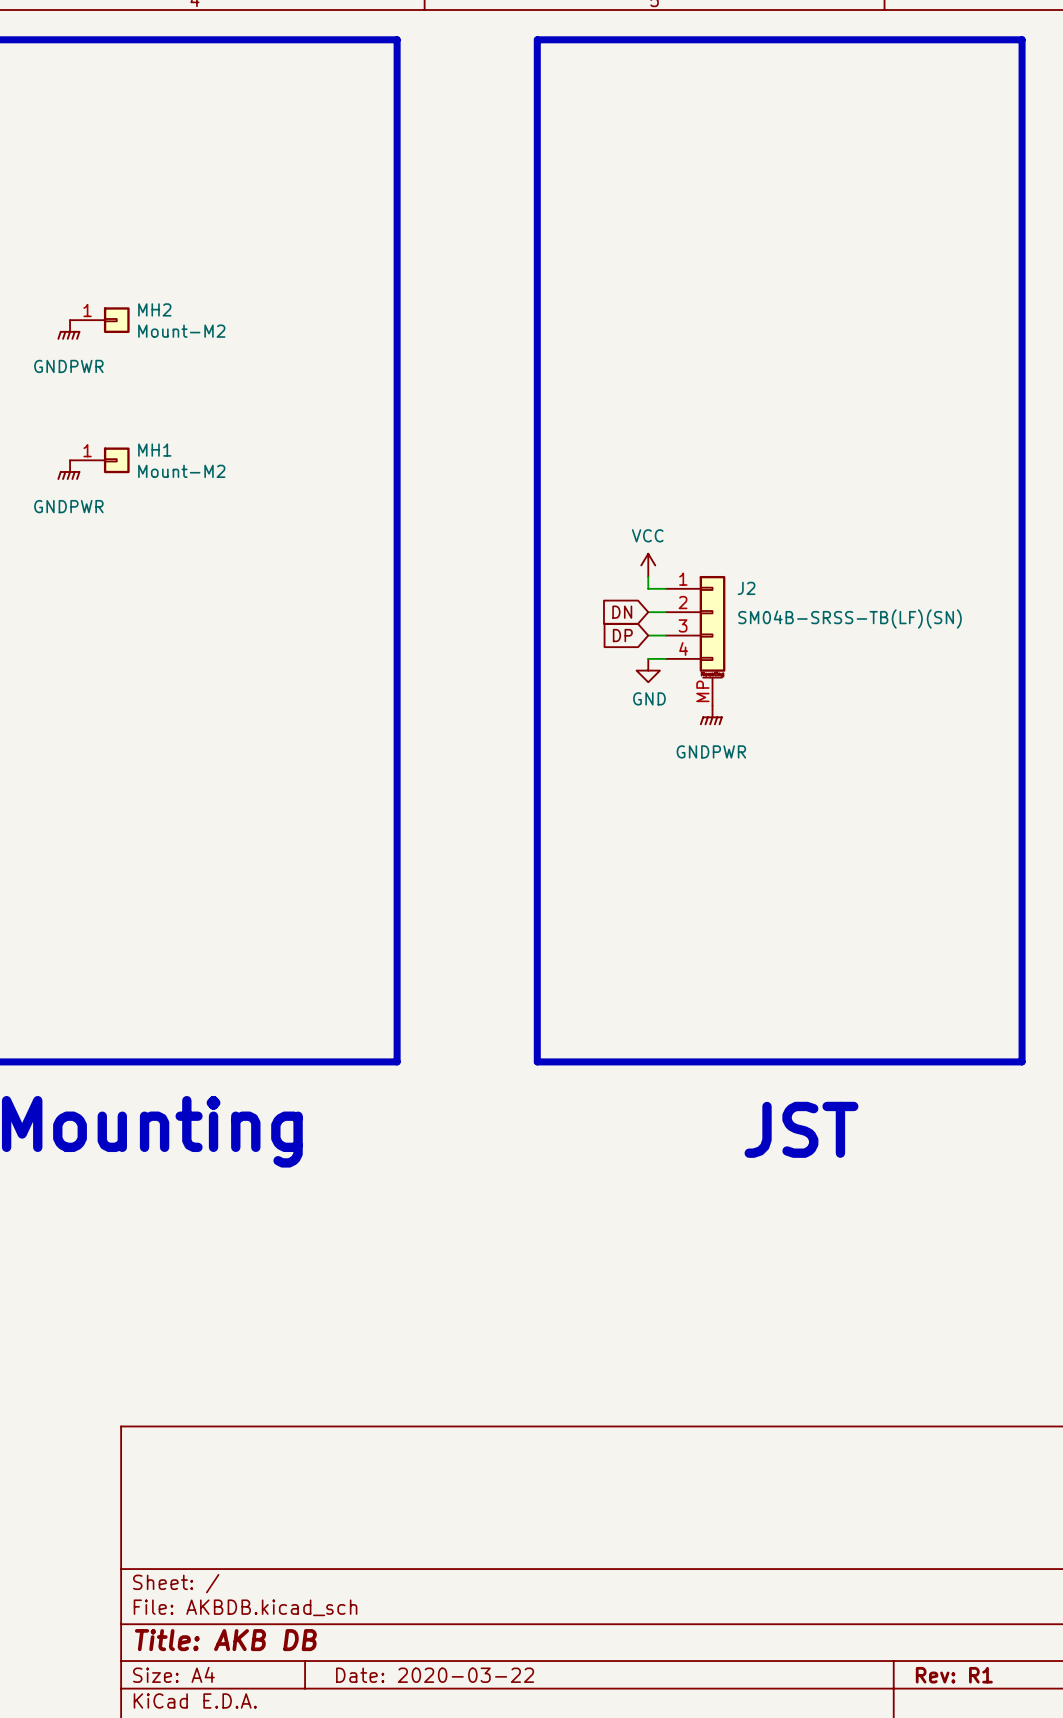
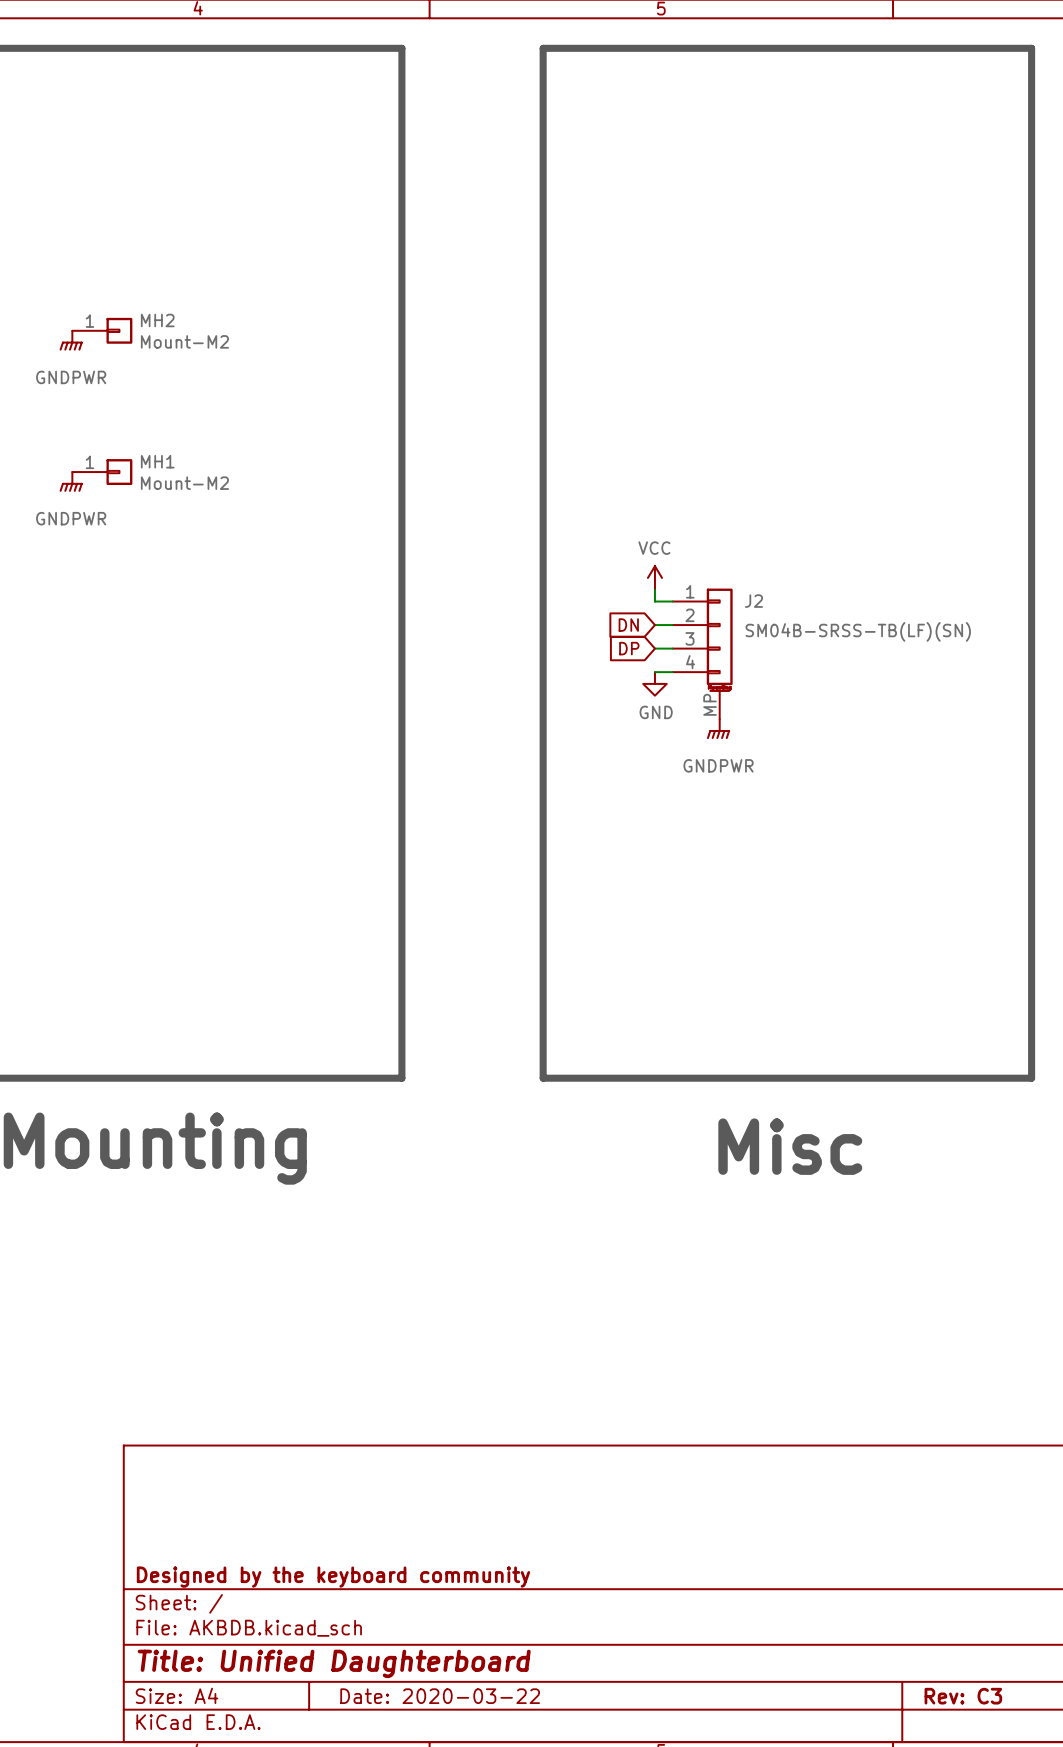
text: JST (801, 1129) -> Misc (790, 1146)
title block: none -> Designed by the keyboard community (333, 1577)
title block: Title: AKB DB (225, 1640) -> Title: Unified Daughterboard (334, 1663)
title block: Rev: R1 (954, 1675) -> Rev: C3 (963, 1696)

